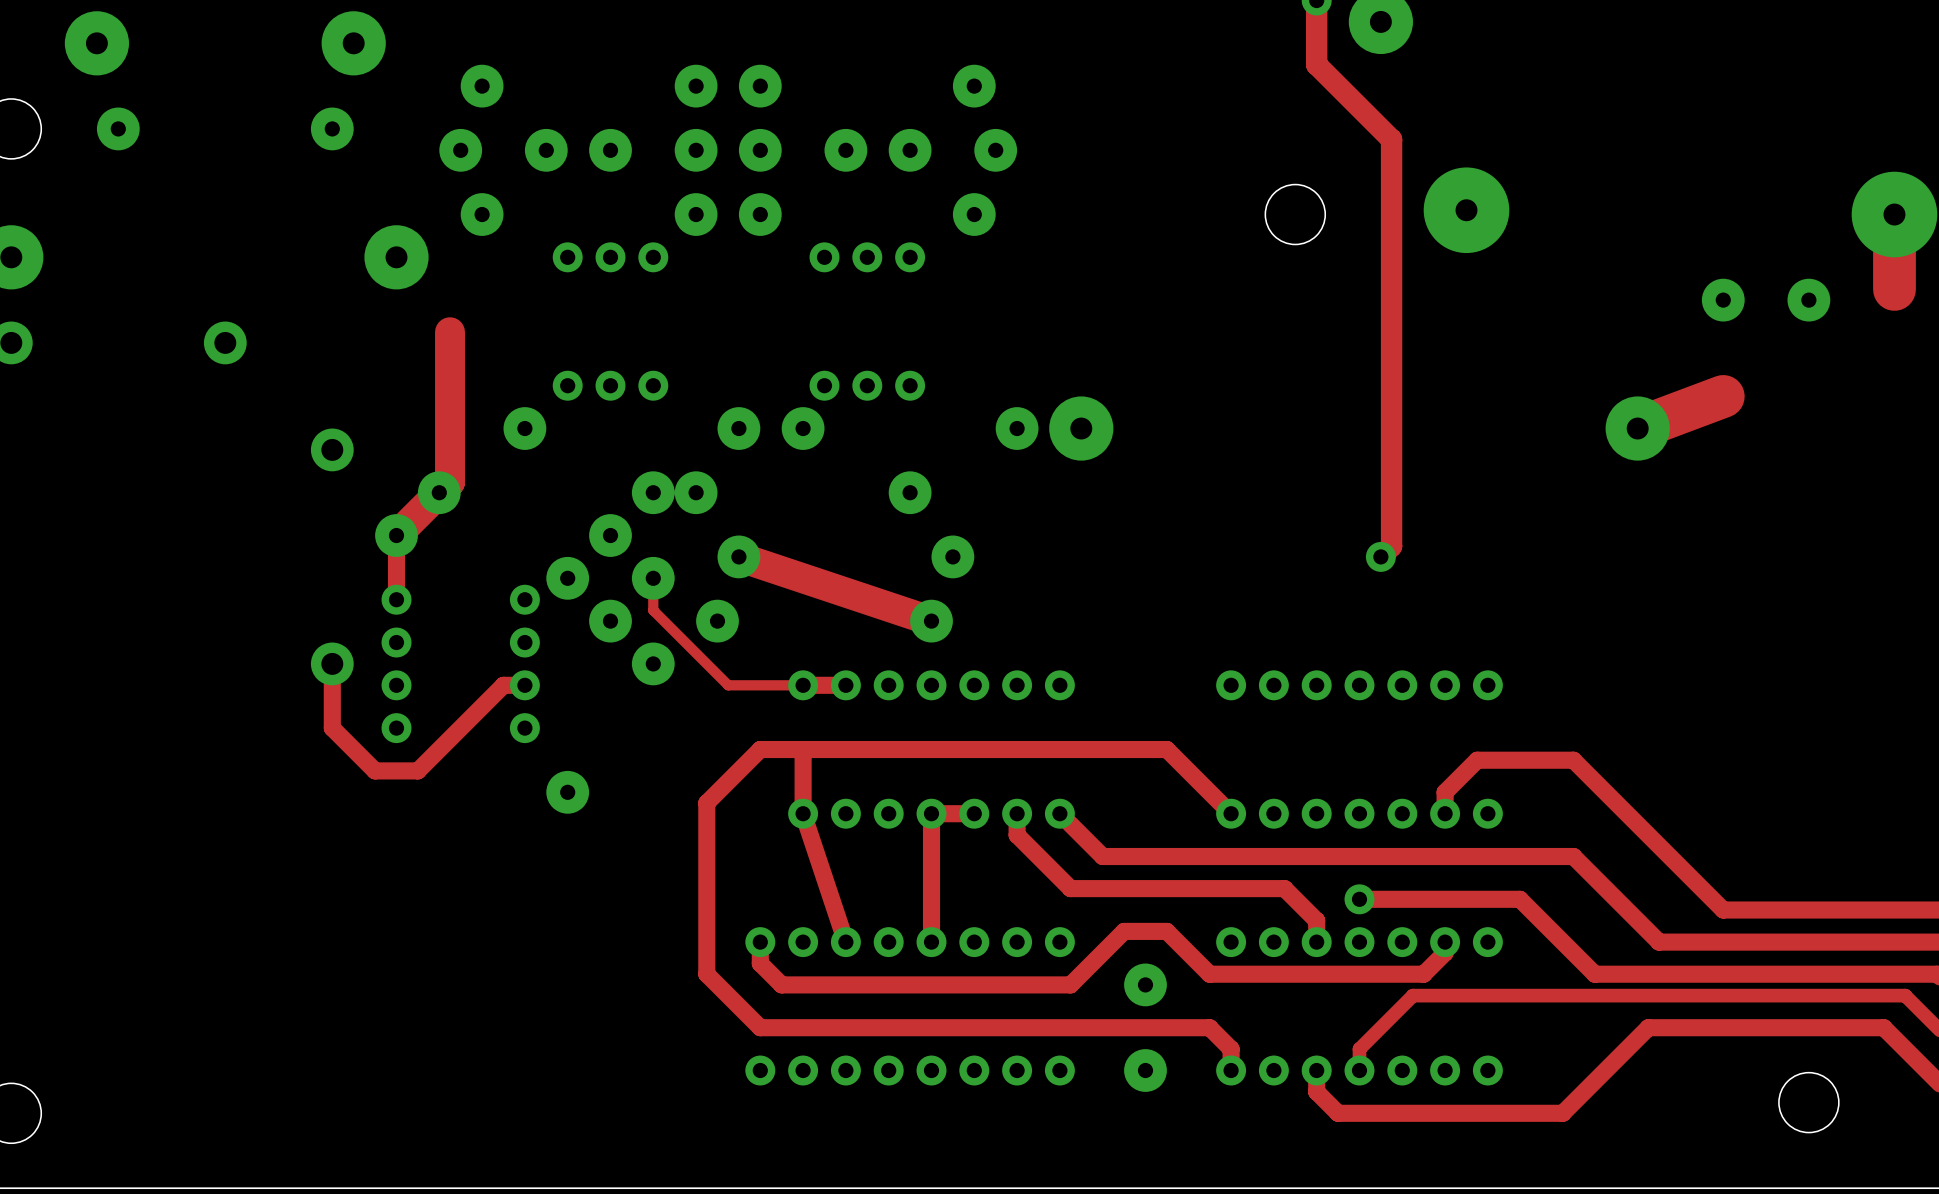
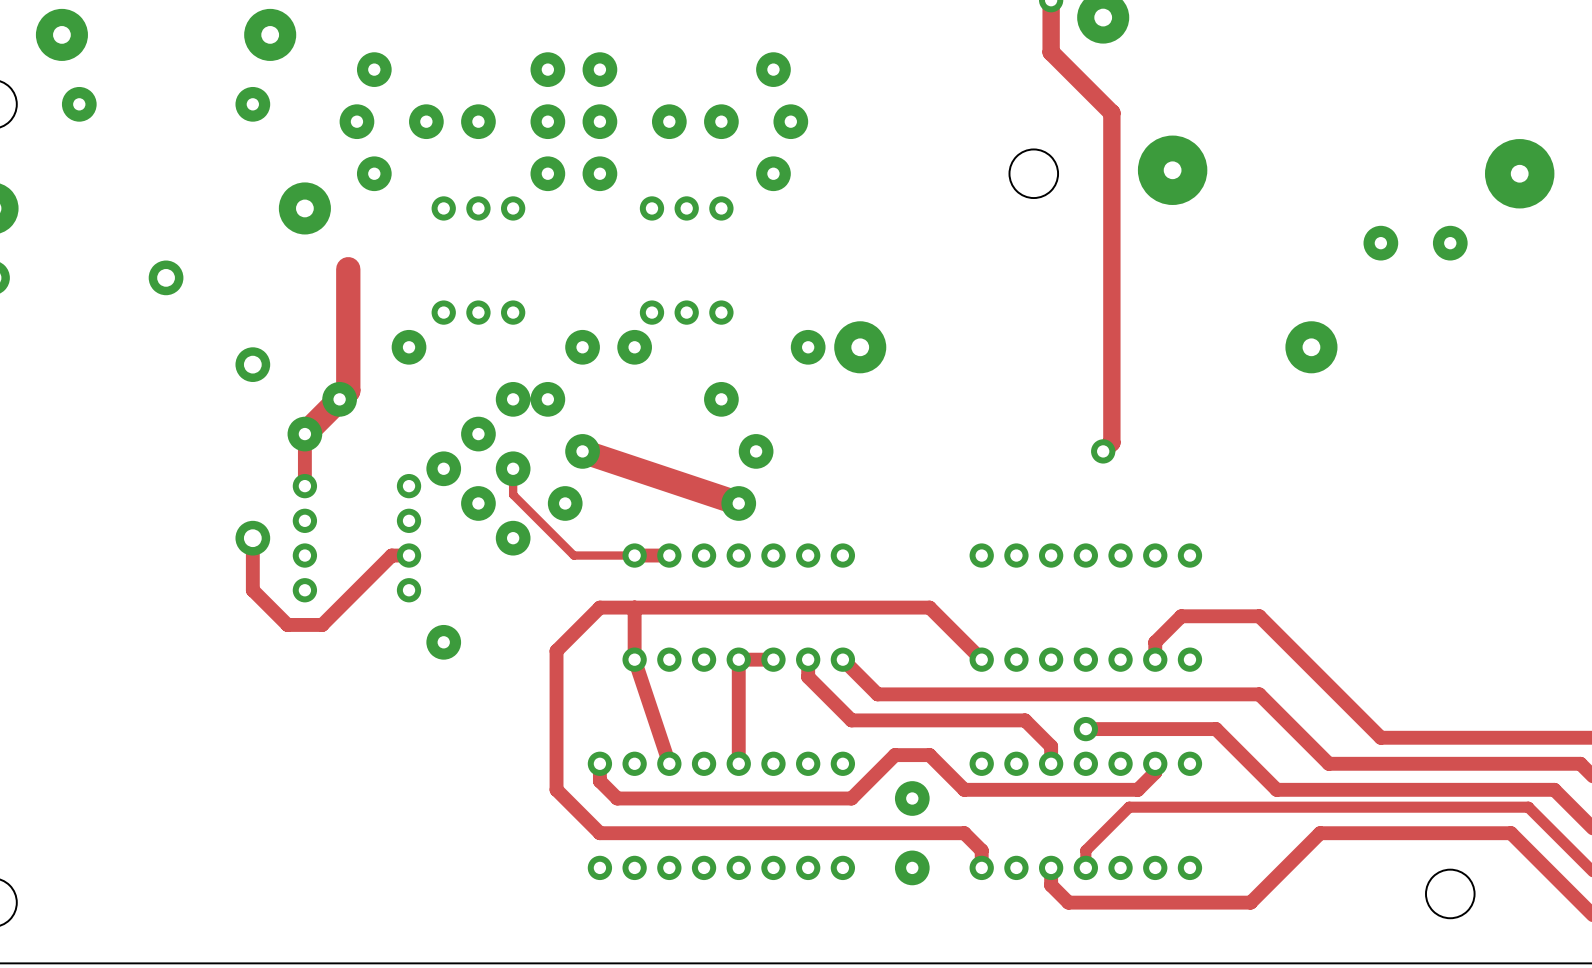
top track: (1894, 214) (1894, 289) -> none
top track: (1723, 396) (1637, 428) -> none

